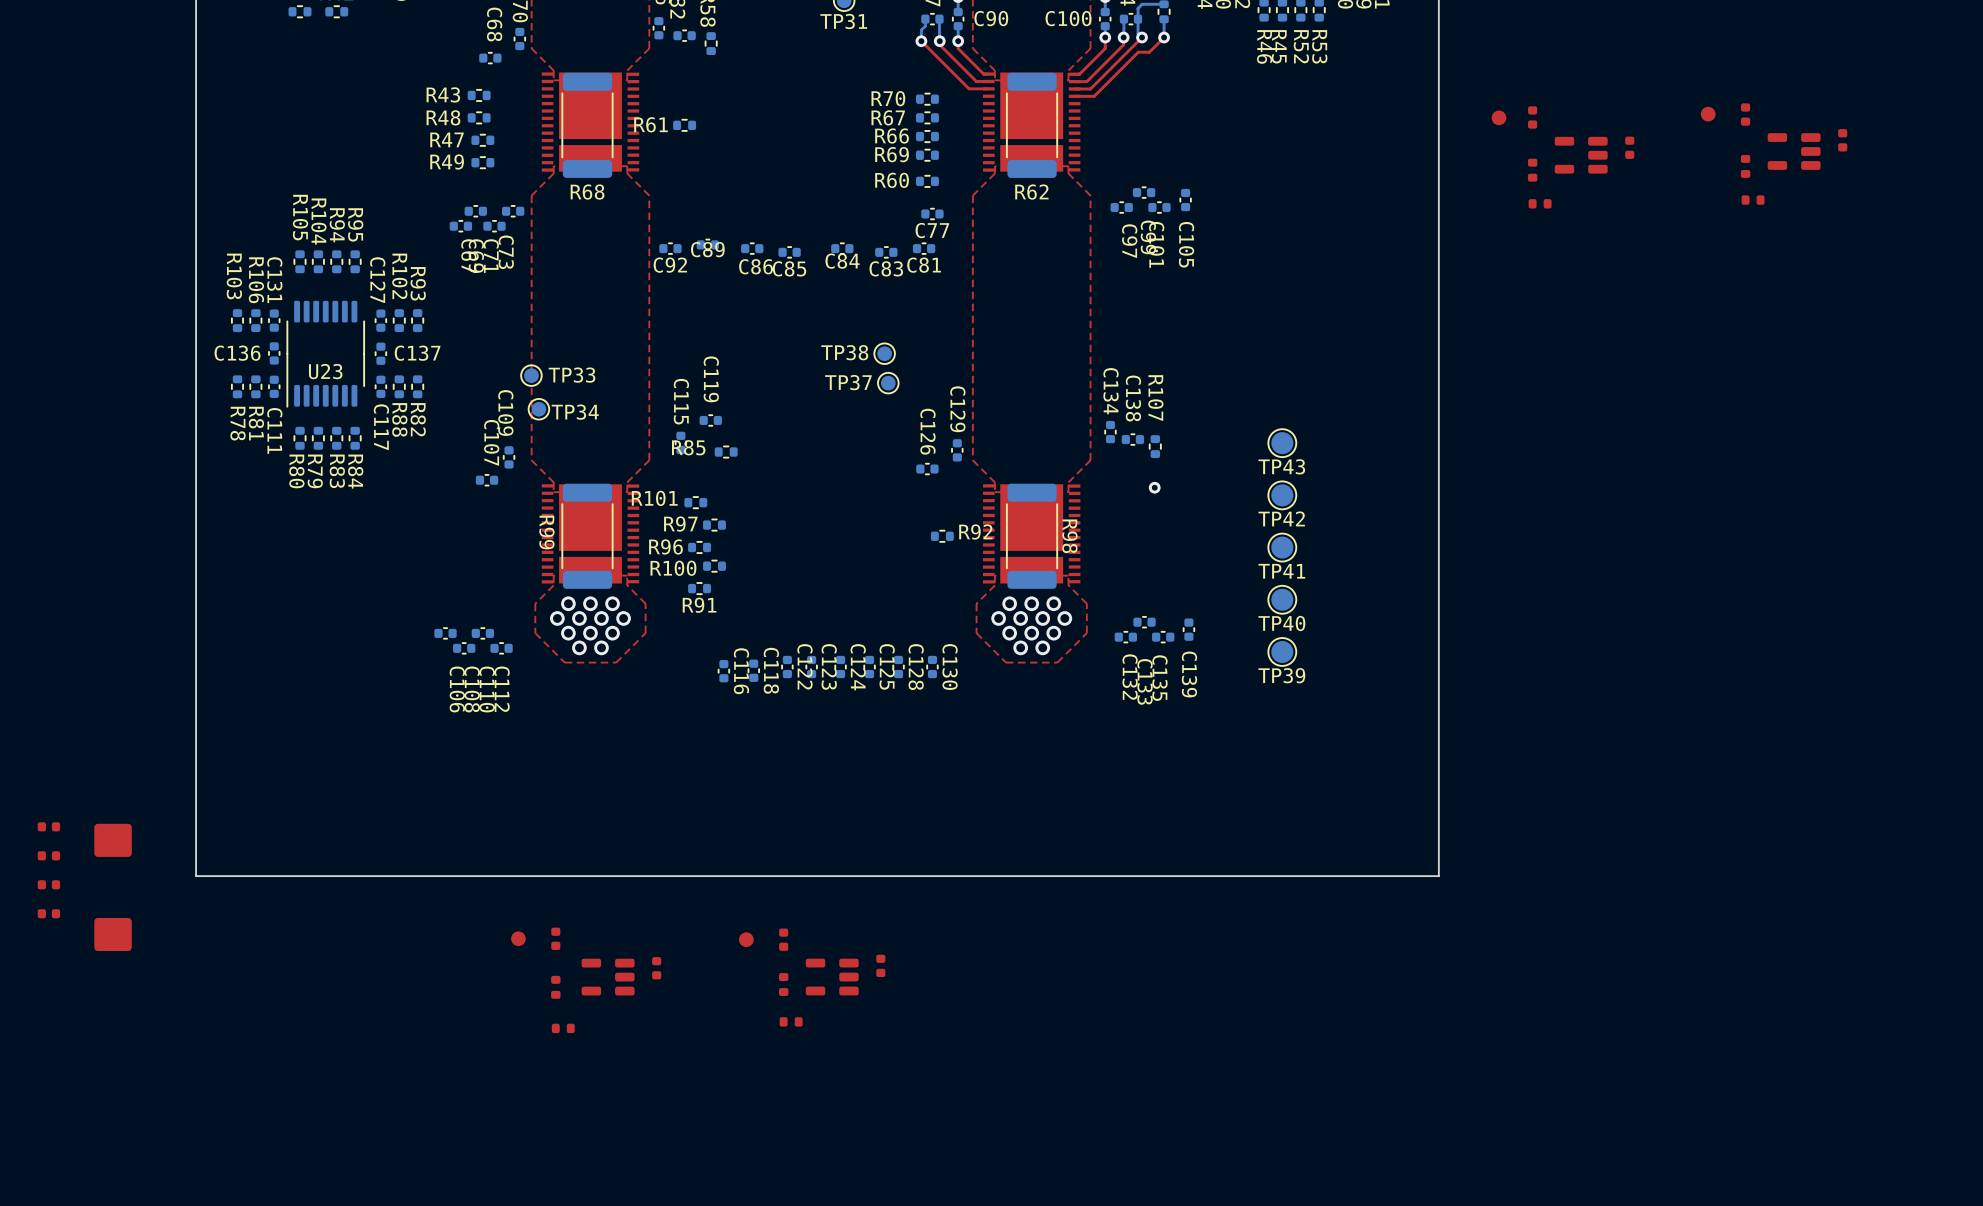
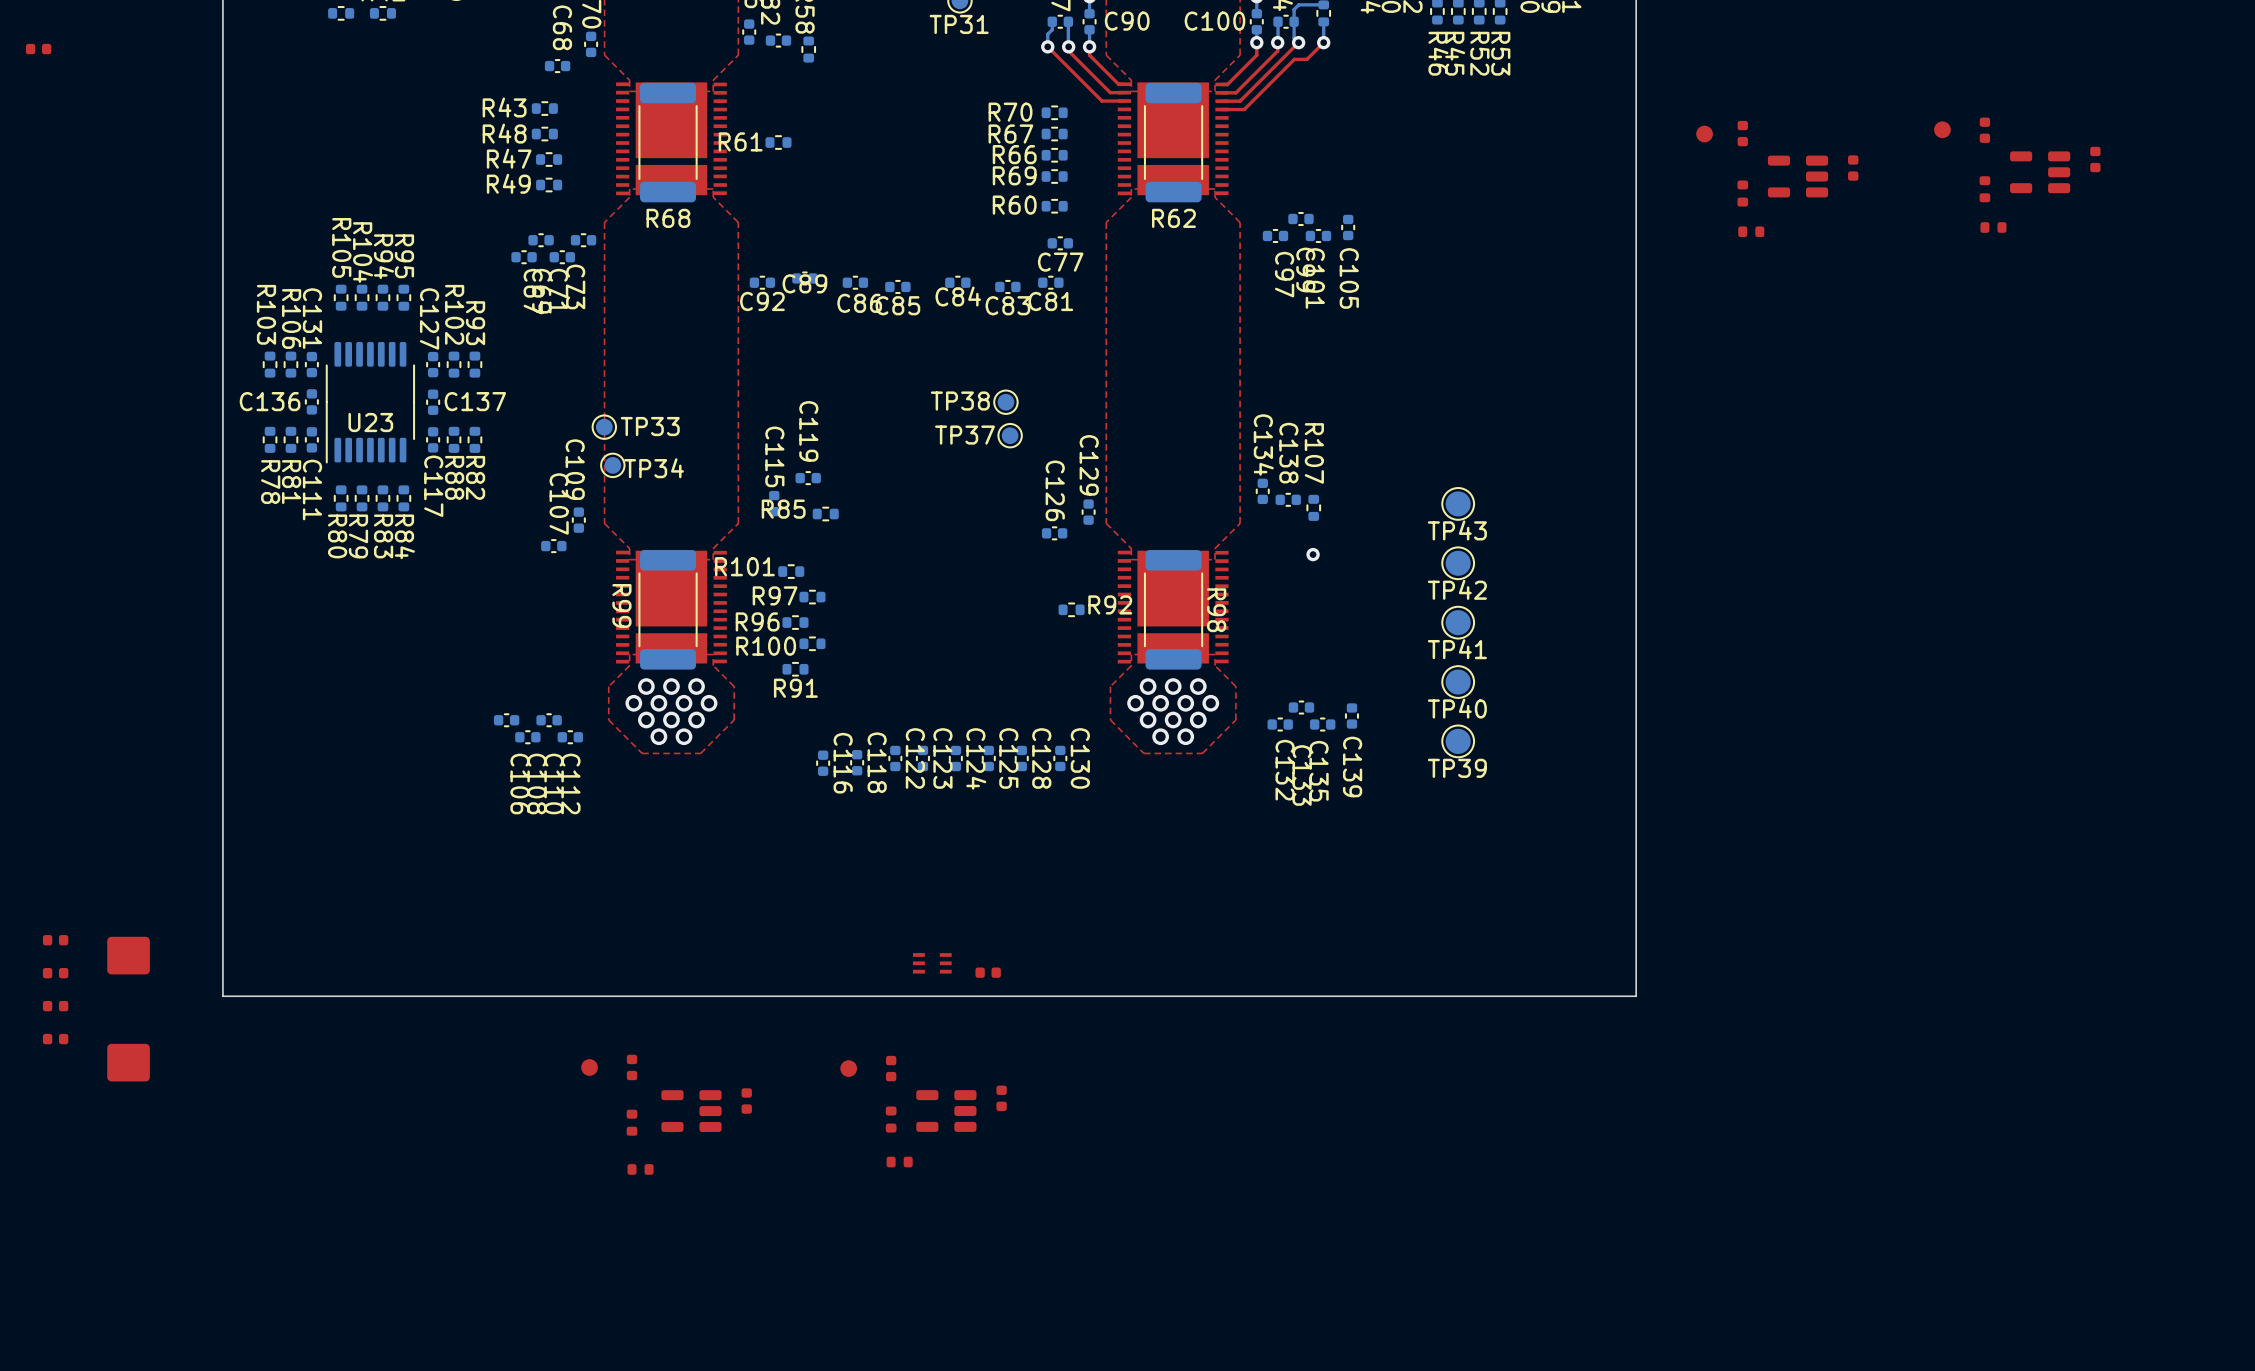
part: none -> (38, 49)
part: none -> (932, 963)
part: none -> (988, 972)

